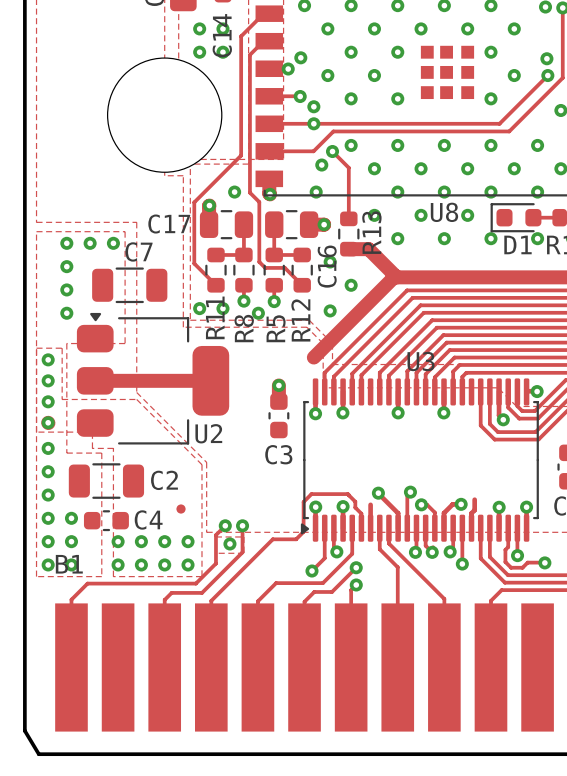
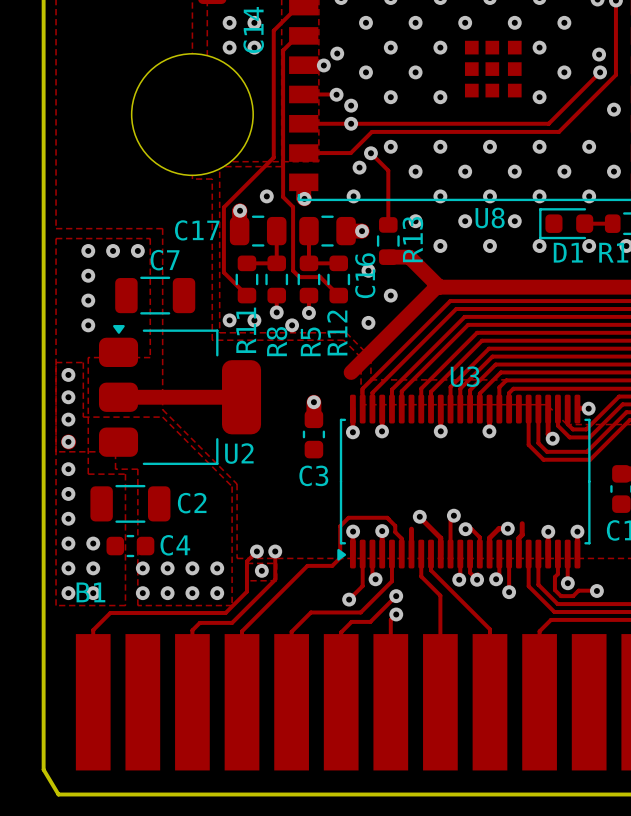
part: (181, 509) -> none

